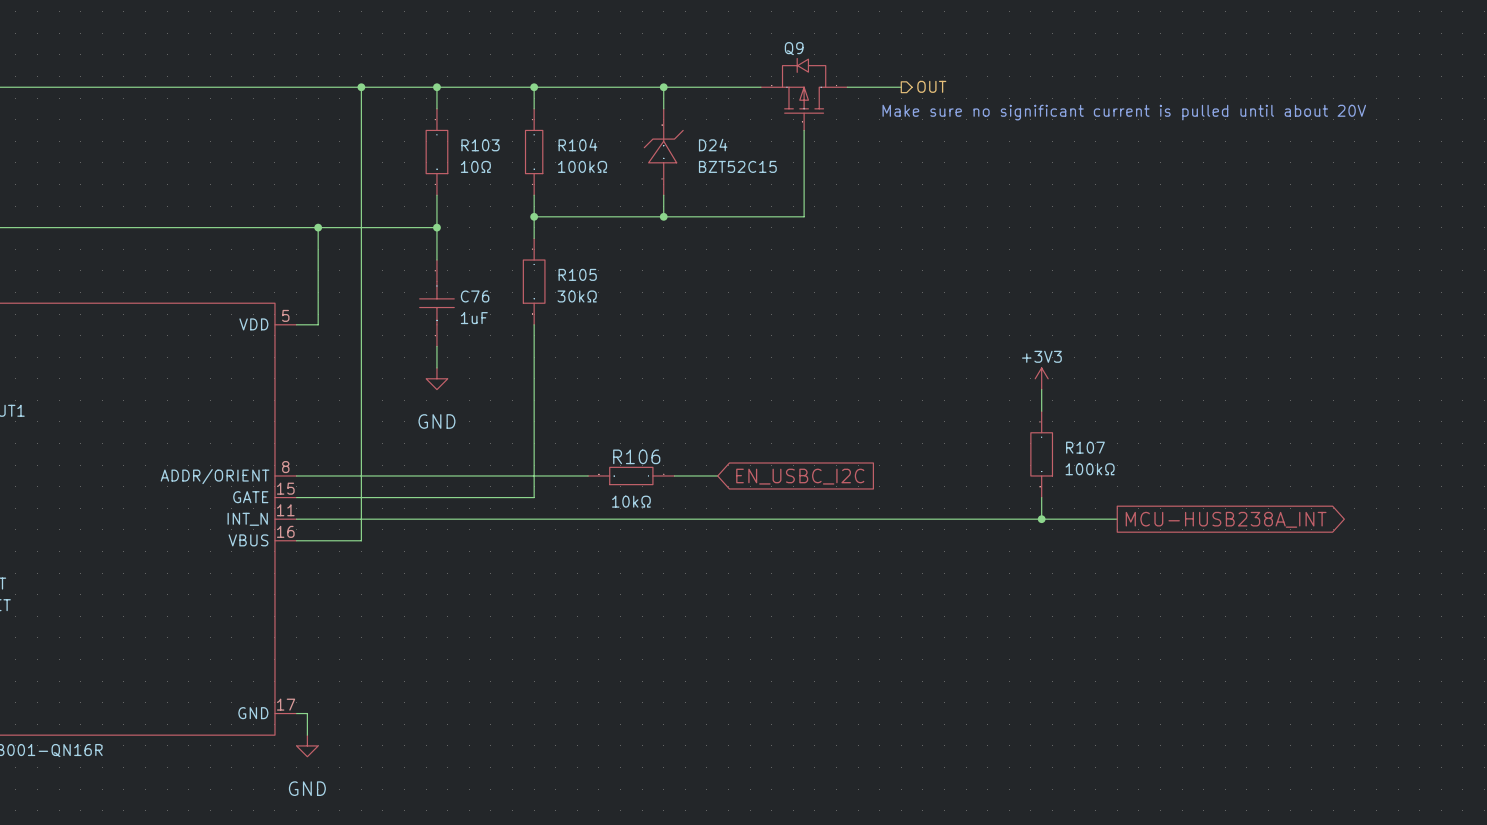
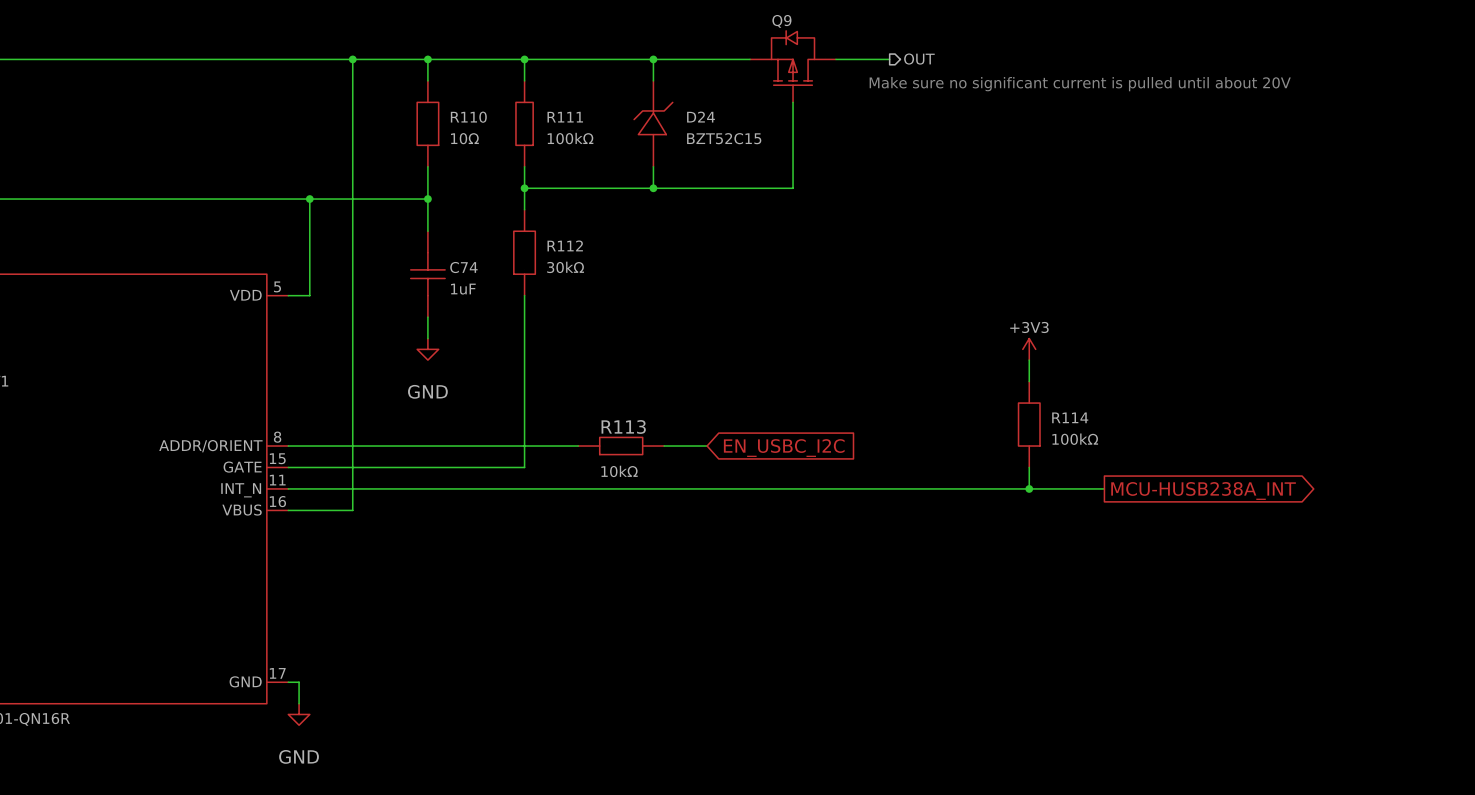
R103 name: R103 (480, 145) -> R110 (468, 117)
R104 name: R104 (577, 145) -> R111 (565, 117)
R105 name: R105 (577, 274) -> R112 (565, 245)
C76 name: C76 (475, 296) -> C74 (463, 267)
R107 name: R107 (1085, 447) -> R114 (1070, 417)
R106 name: R106 (636, 456) -> R113 (623, 426)

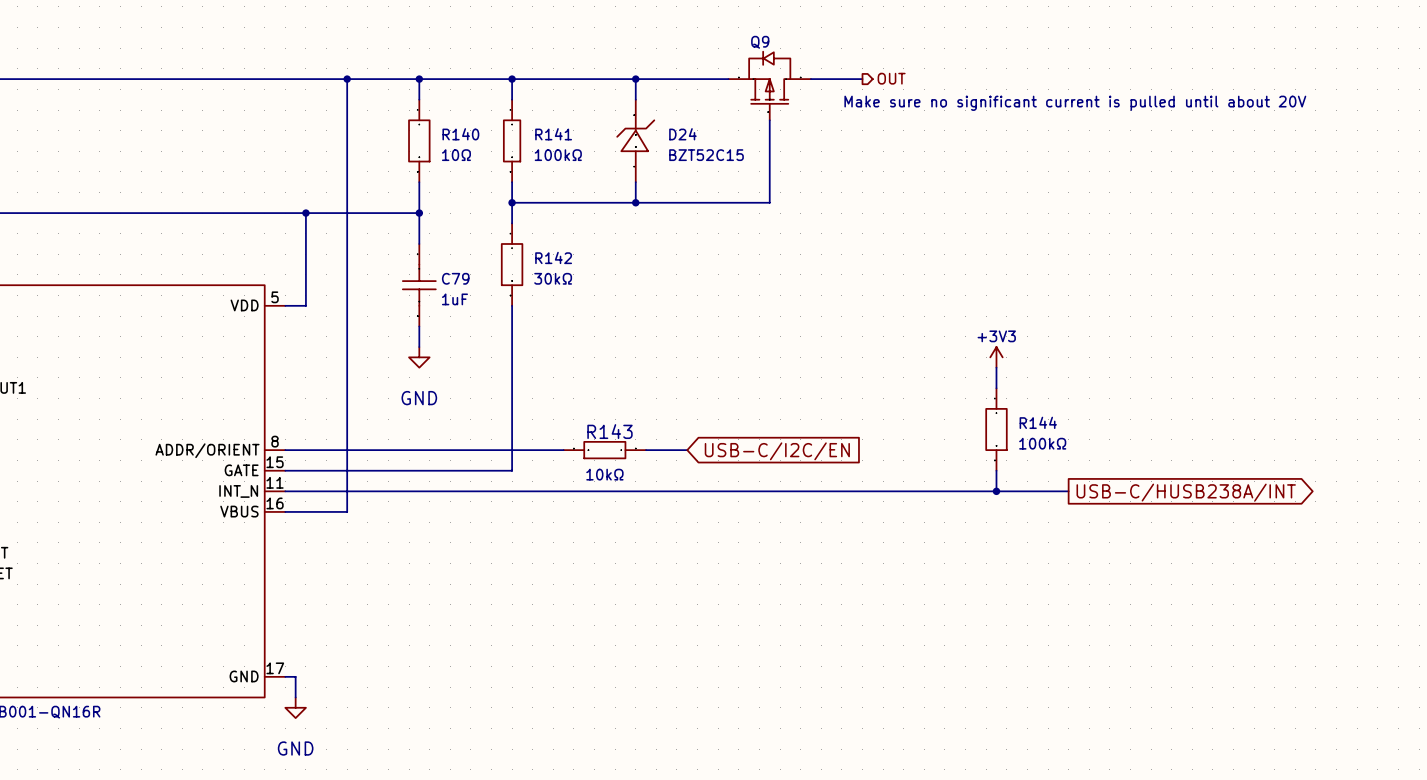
R110 name: R110 (468, 117) -> R140 (460, 134)
R111 name: R111 (565, 117) -> R141 (553, 134)
R112 name: R112 (565, 245) -> R142 (553, 257)
C74 name: C74 (463, 267) -> C79 (455, 278)
R114 name: R114 (1070, 417) -> R144 (1038, 422)
R113 name: R113 (623, 426) -> R143 (609, 431)
global label: EN_USBC_I2C (784, 448) -> USB-C/I2C/EN (777, 451)
global label: MCU-HUSB238A_INT (1203, 490) -> USB-C/HUSB238A/INT (1186, 492)

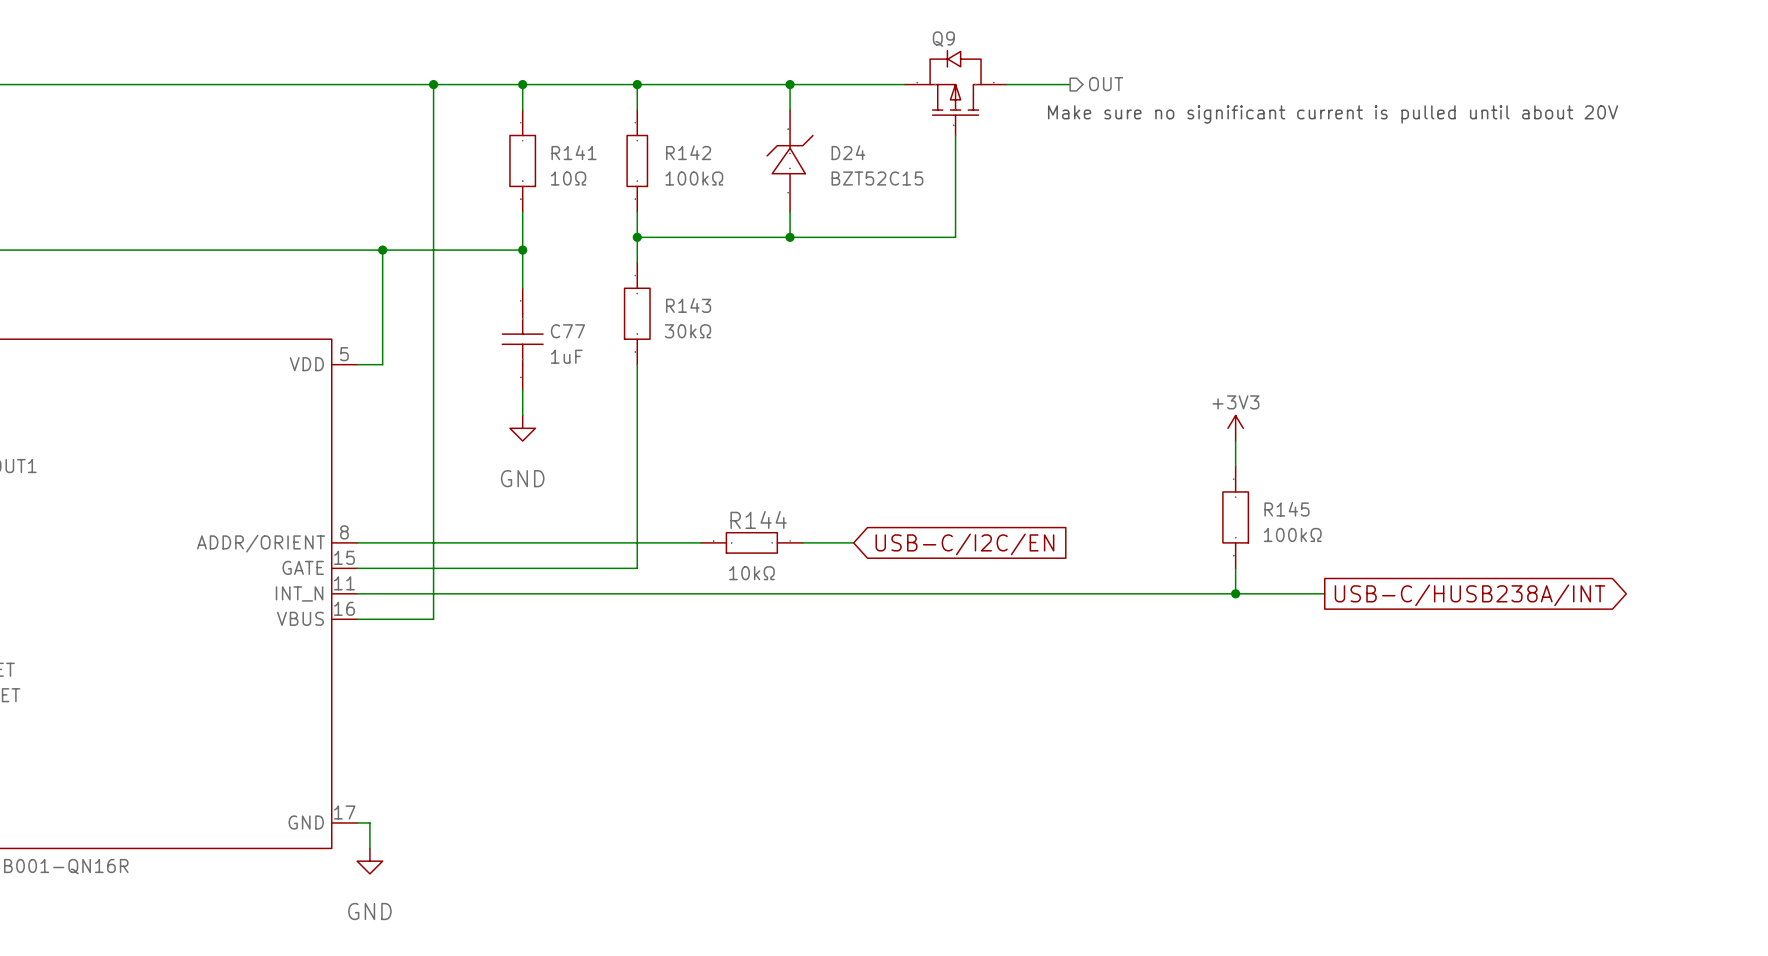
R140 name: R140 (460, 134) -> R141 (574, 152)
R141 name: R141 (553, 134) -> R142 (688, 152)
R142 name: R142 (553, 257) -> R143 (688, 305)
C79 name: C79 (455, 278) -> C77 (567, 331)
R144 name: R144 (1038, 422) -> R145 (1286, 509)
R143 name: R143 (609, 431) -> R144 (758, 519)

